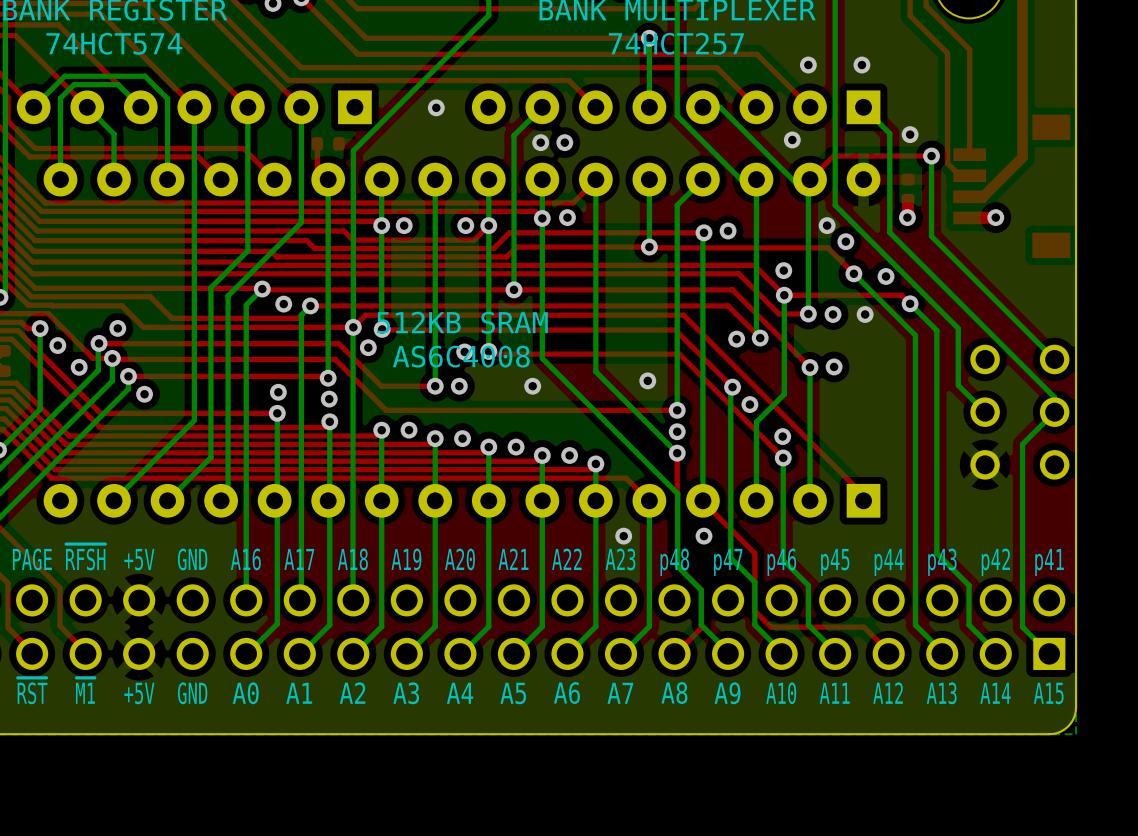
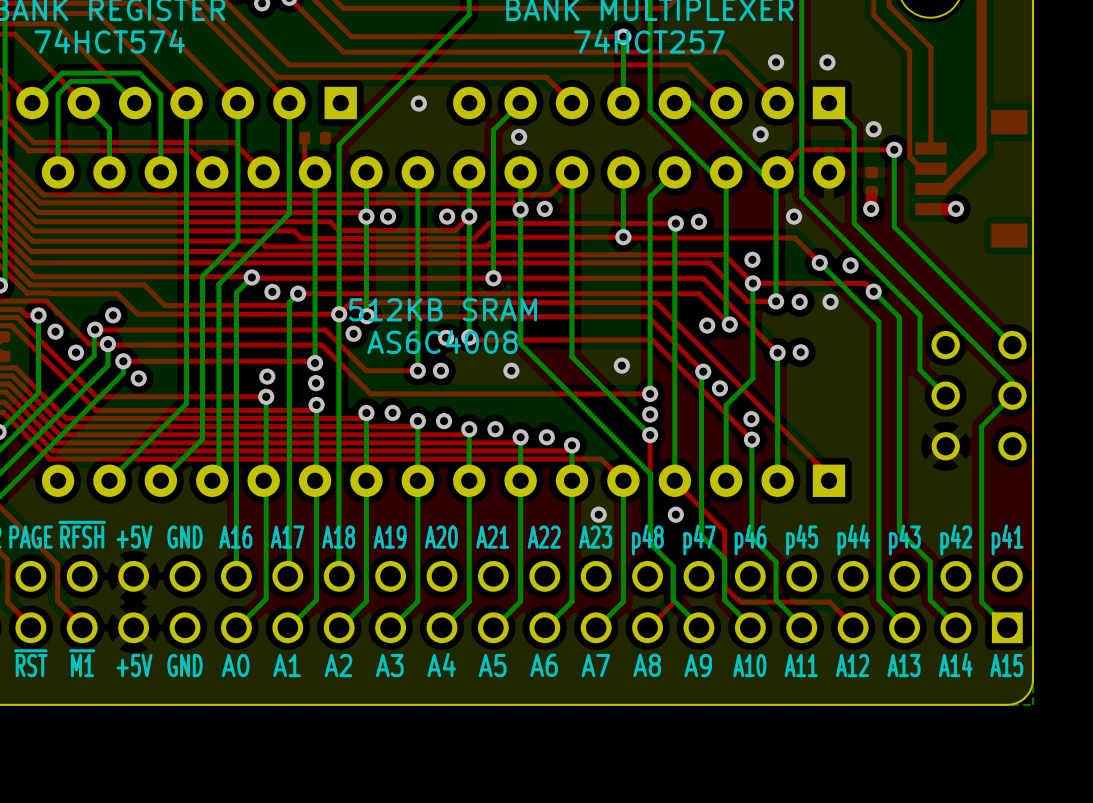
via: (564, 142) -> none
via: (845, 241) -> none

